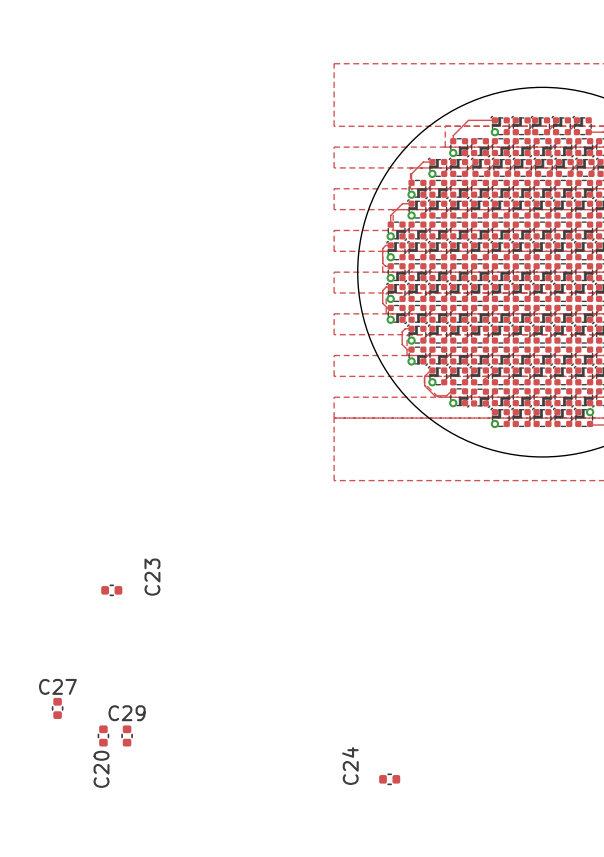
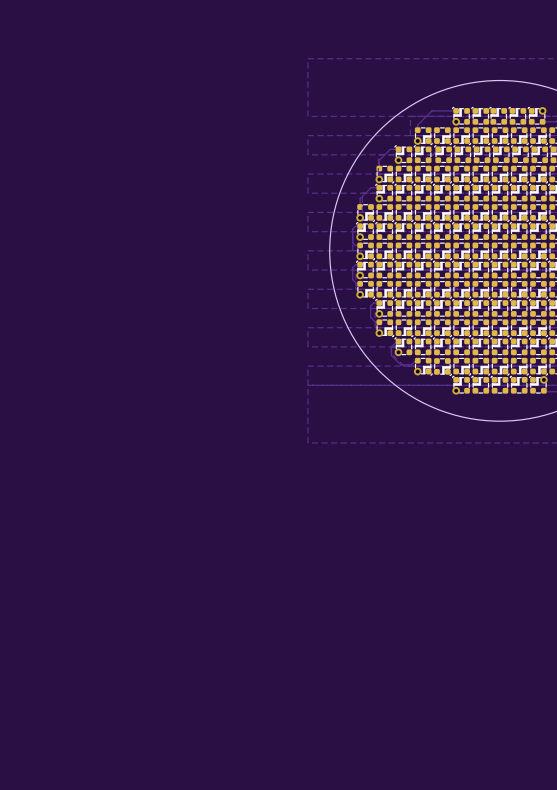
via: none -> (542, 110)
C23: (111, 590) -> none
C27: (57, 708) -> none
C20: (103, 735) -> none
C29: (127, 735) -> none
C24: (389, 779) -> none

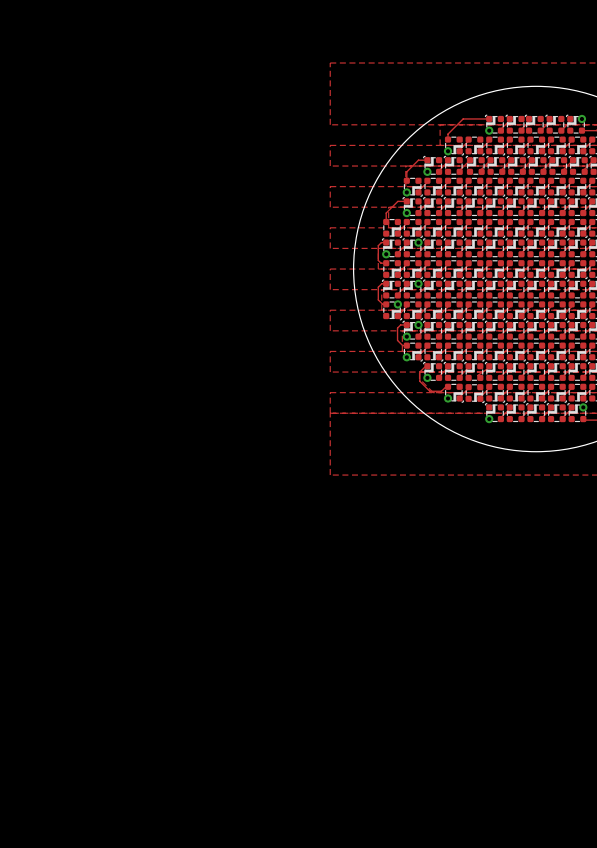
via: (360, 217) -> none
via: none -> (418, 242)
via: (360, 256) -> none
via: none -> (418, 283)
via: (360, 275) -> none
via: none -> (397, 304)
via: (360, 294) -> none
via: none -> (418, 324)

